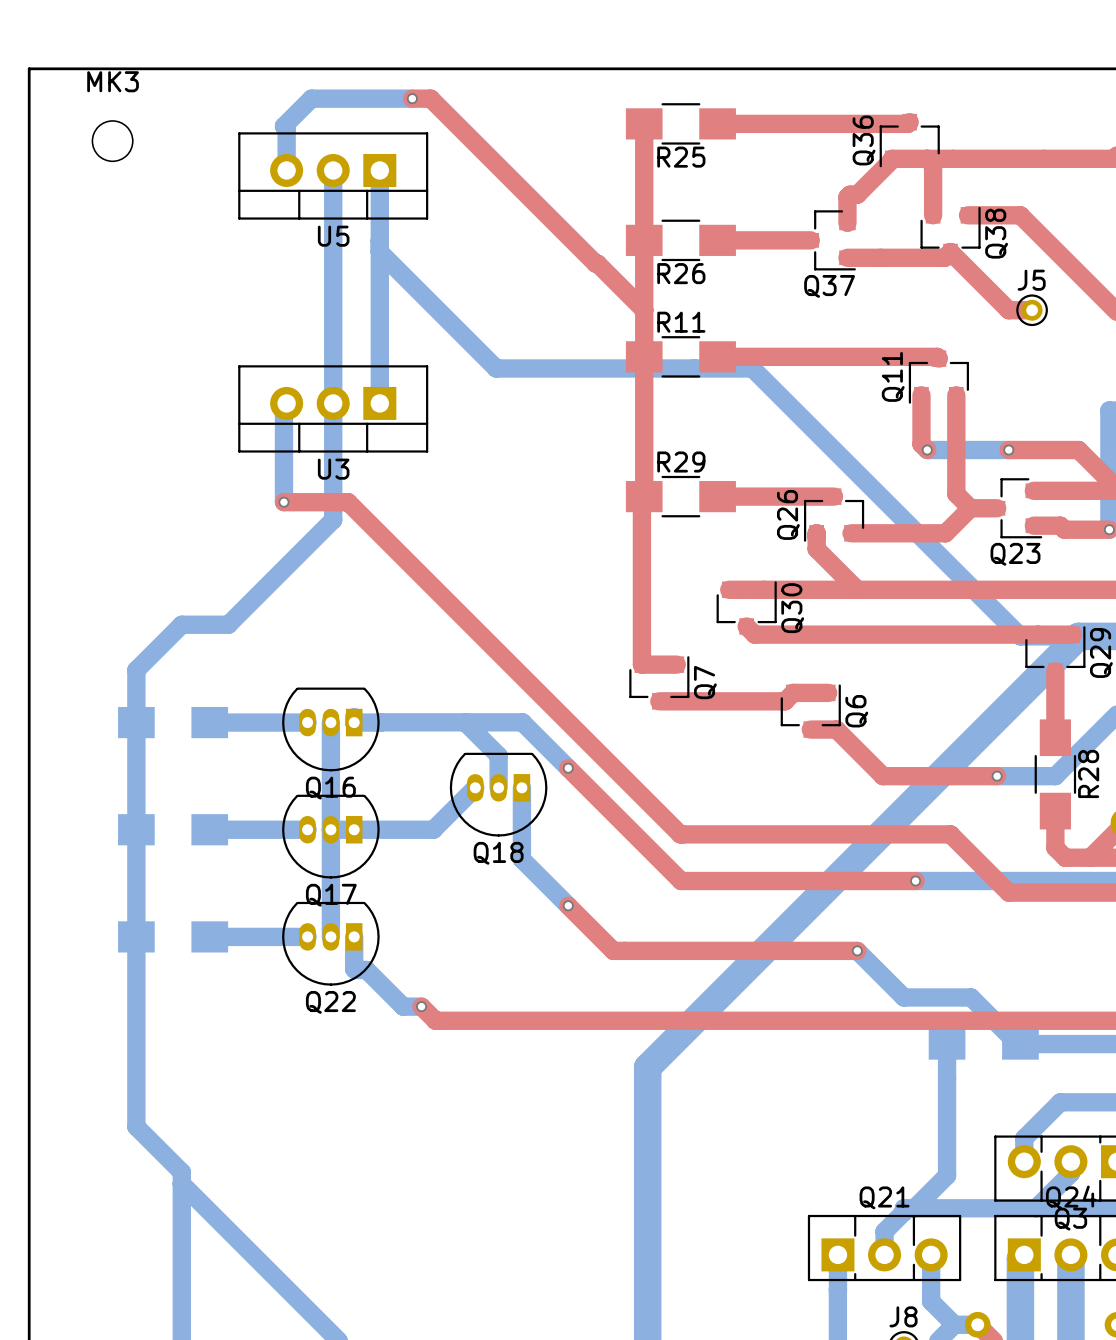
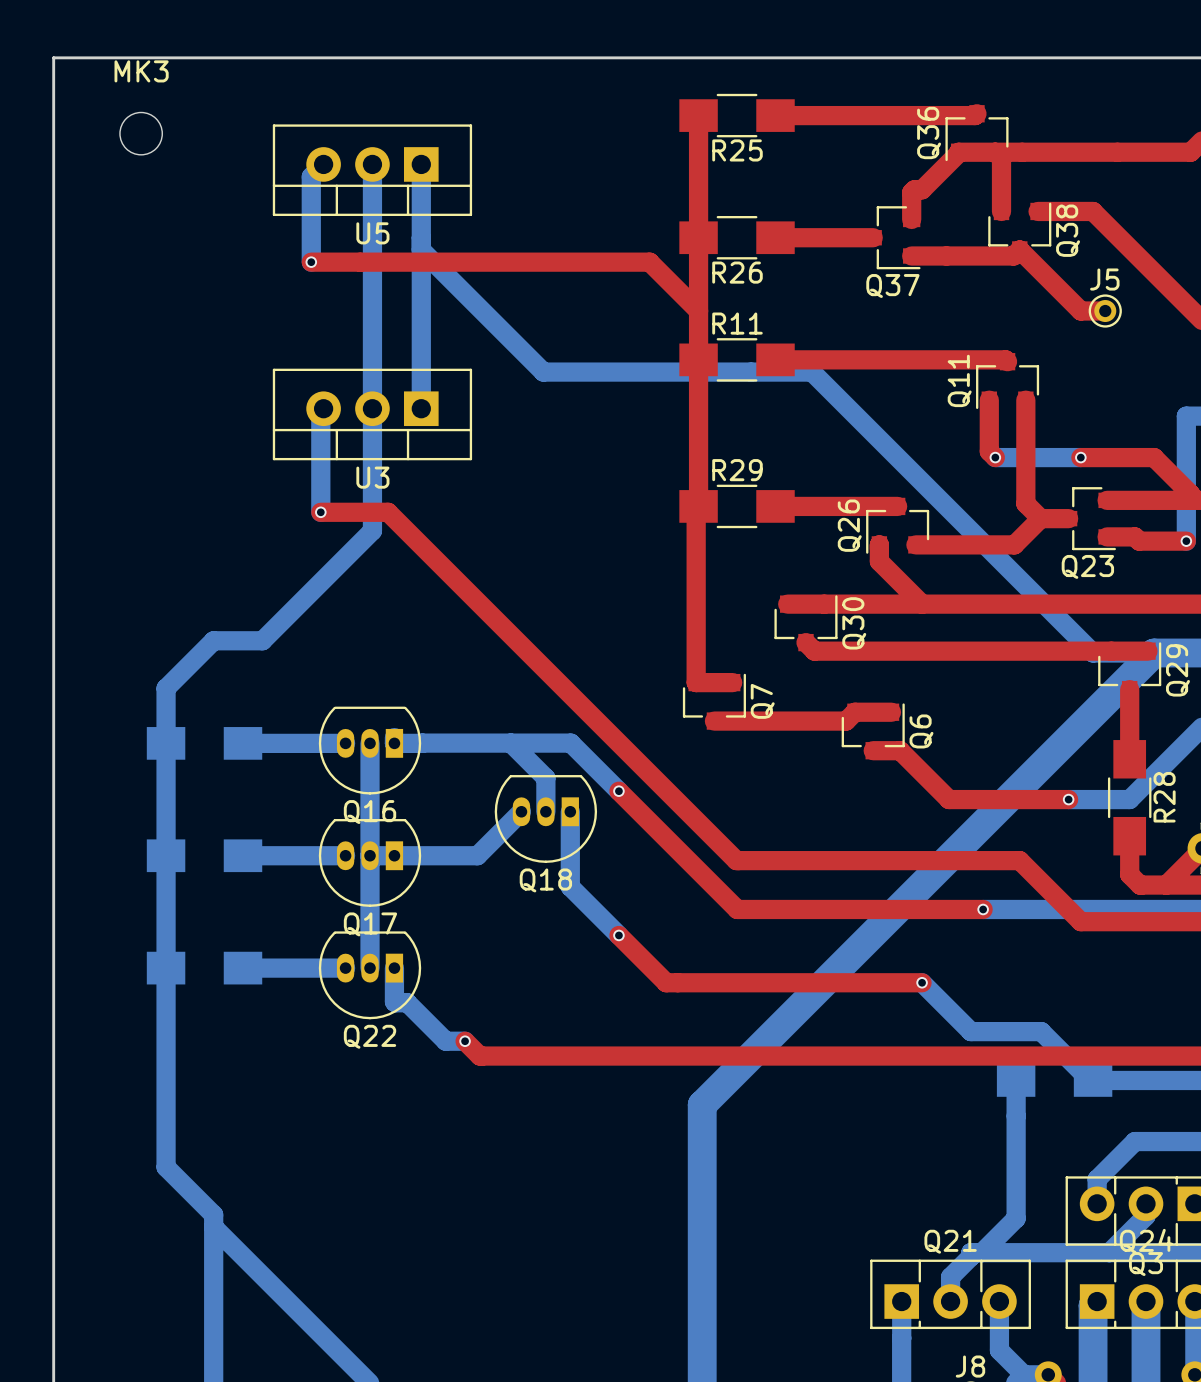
top track: (412, 98) (430, 98) (595, 263) -> (311, 262) (647, 262)
bottom track: (412, 98) (311, 98) (283, 126) (286, 128) (286, 170) -> (311, 262) (311, 176) (323, 164)
via: (412, 98) -> none
via: none -> (311, 262)

